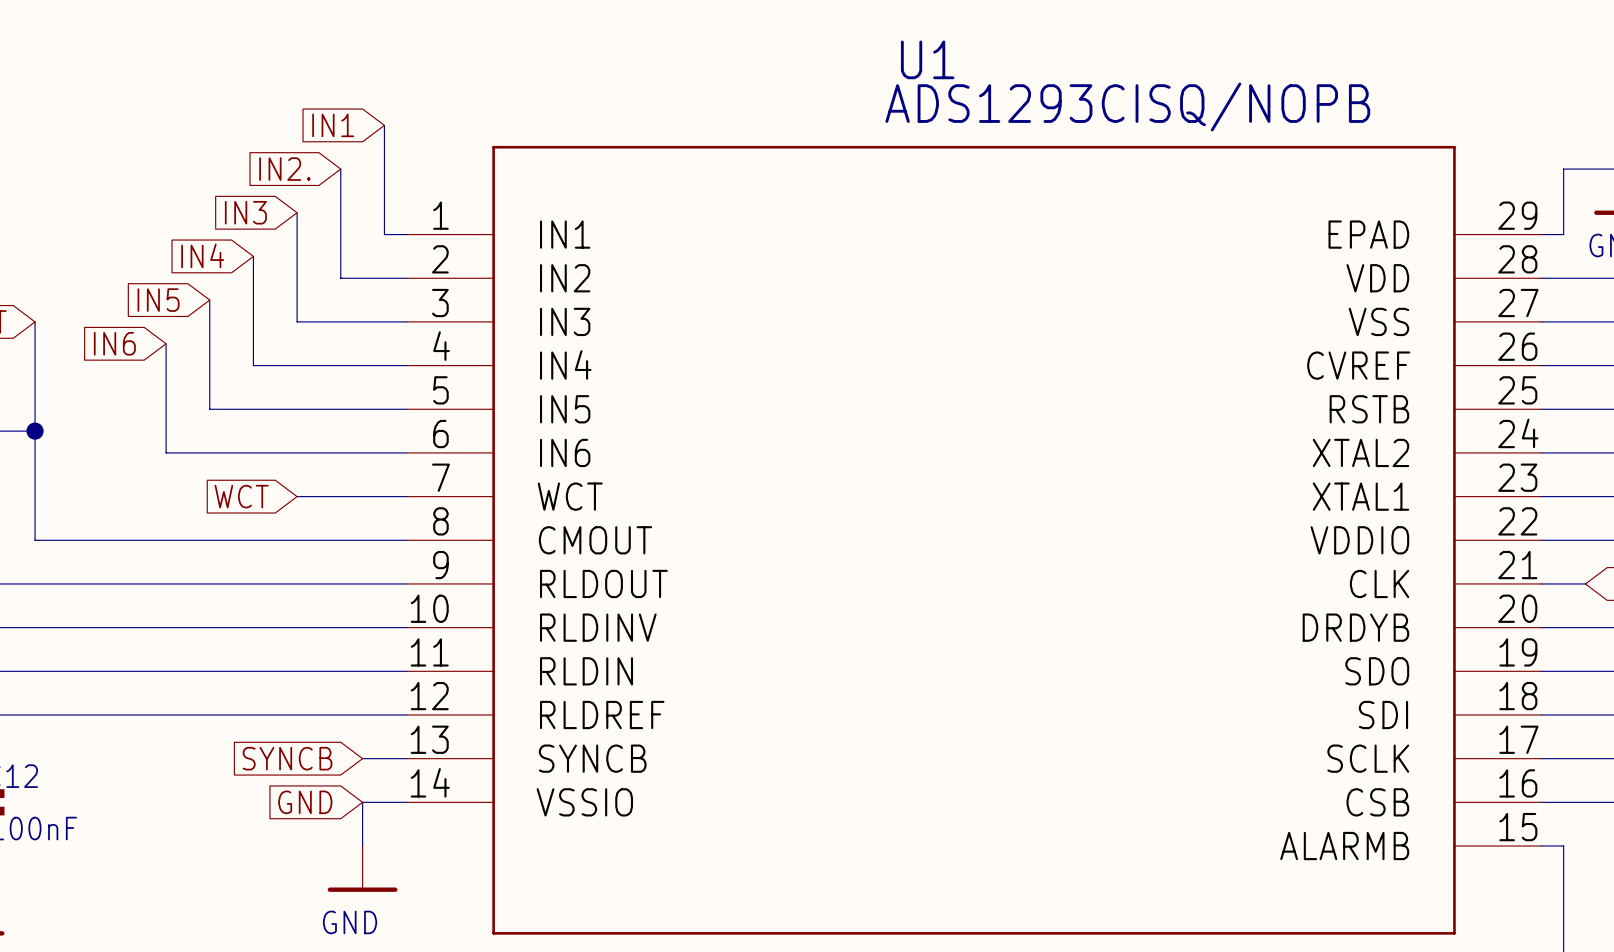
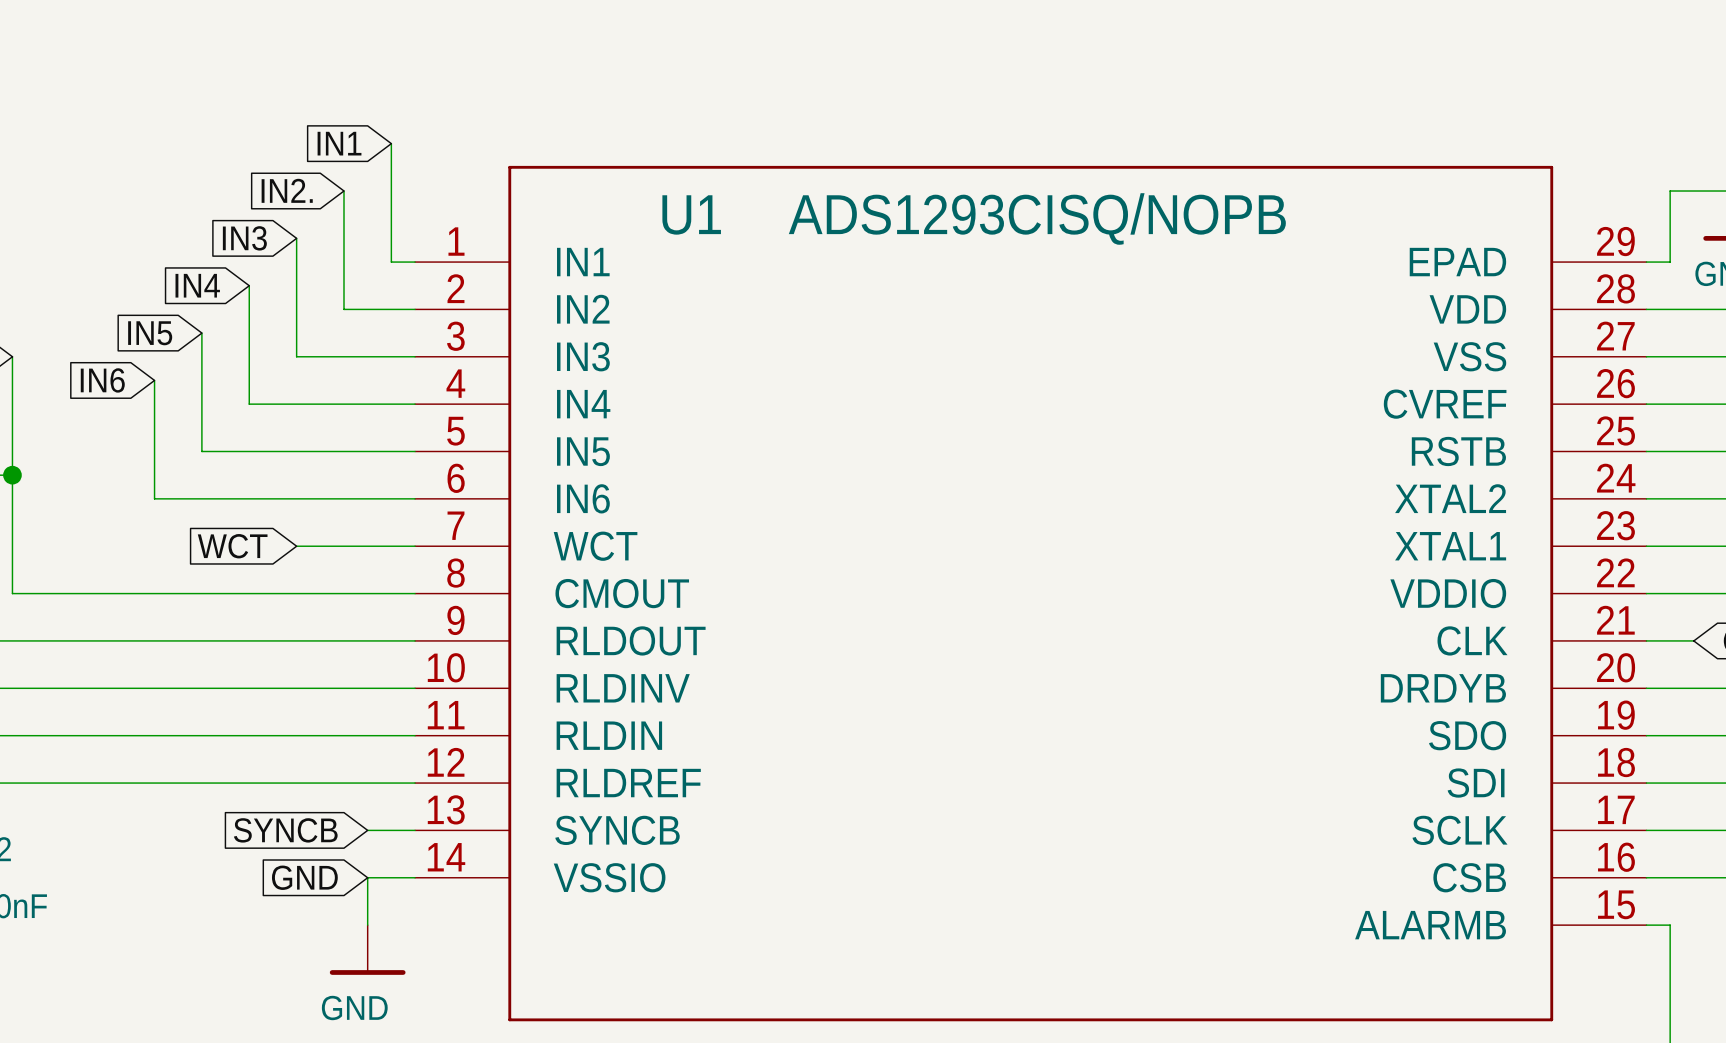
U1 name position: U1 (927, 59) -> U1 (691, 214)
U1 value position: ADS1293CISQ/NOPB (1127, 106) -> ADS1293CISQ/NOPB (1037, 218)

